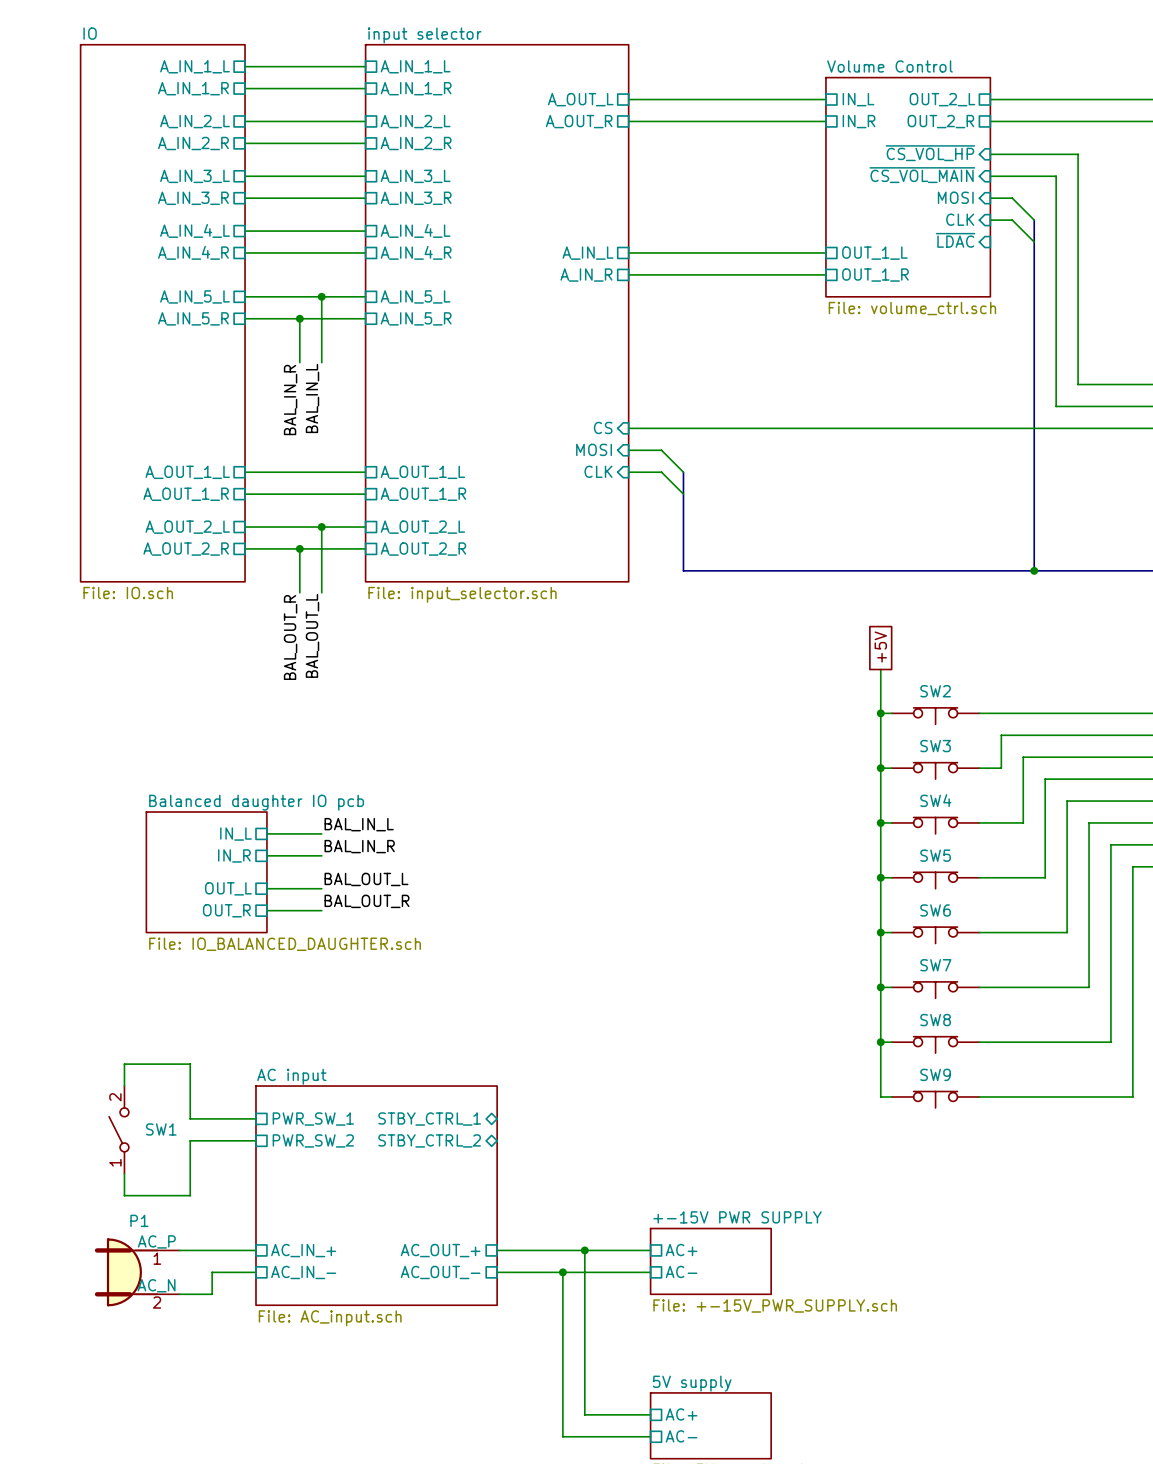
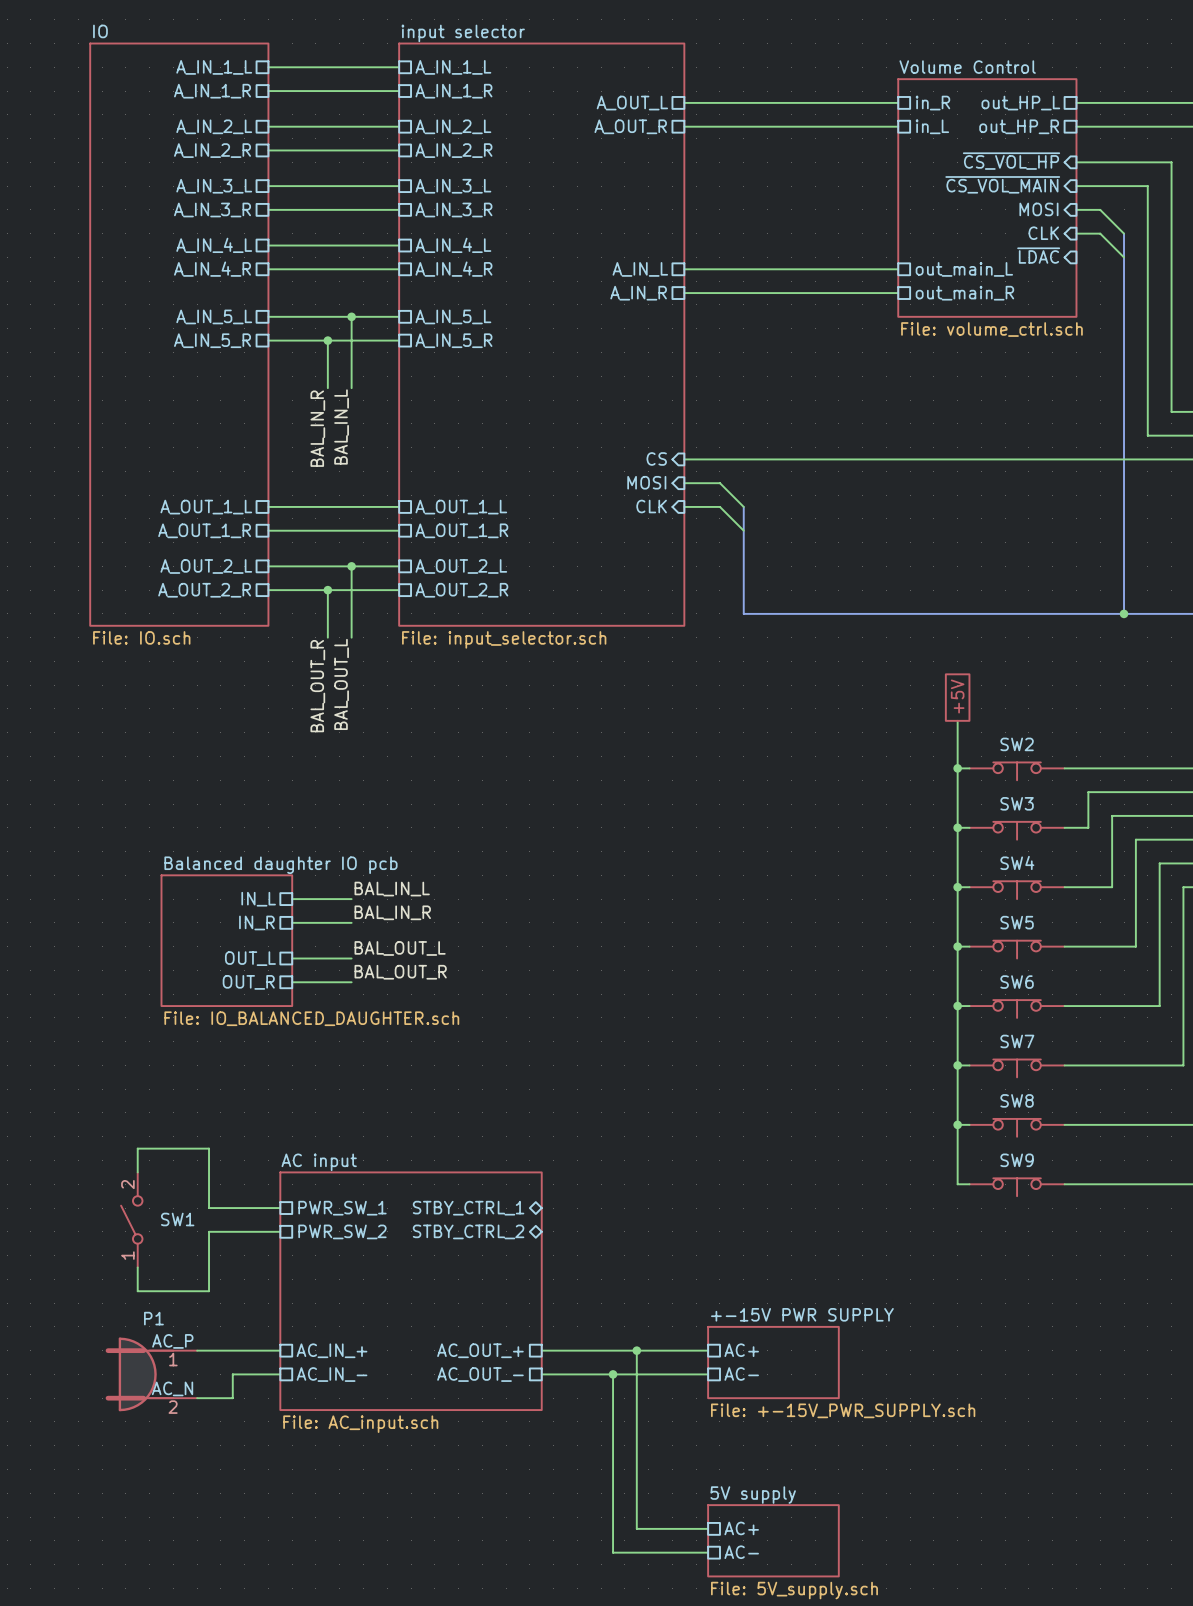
sheet pin: IN_L (858, 99) -> in_R (932, 103)
sheet pin: OUT_2_L (942, 99) -> out_HP_L (1020, 103)
sheet pin: IN_R (859, 121) -> in_L (932, 126)
sheet pin: OUT_2_R (940, 121) -> out_HP_R (1019, 126)
sheet pin: OUT_1_L (874, 253) -> out_main_L (964, 269)
sheet pin: OUT_1_R (875, 275) -> out_main_R (964, 293)

